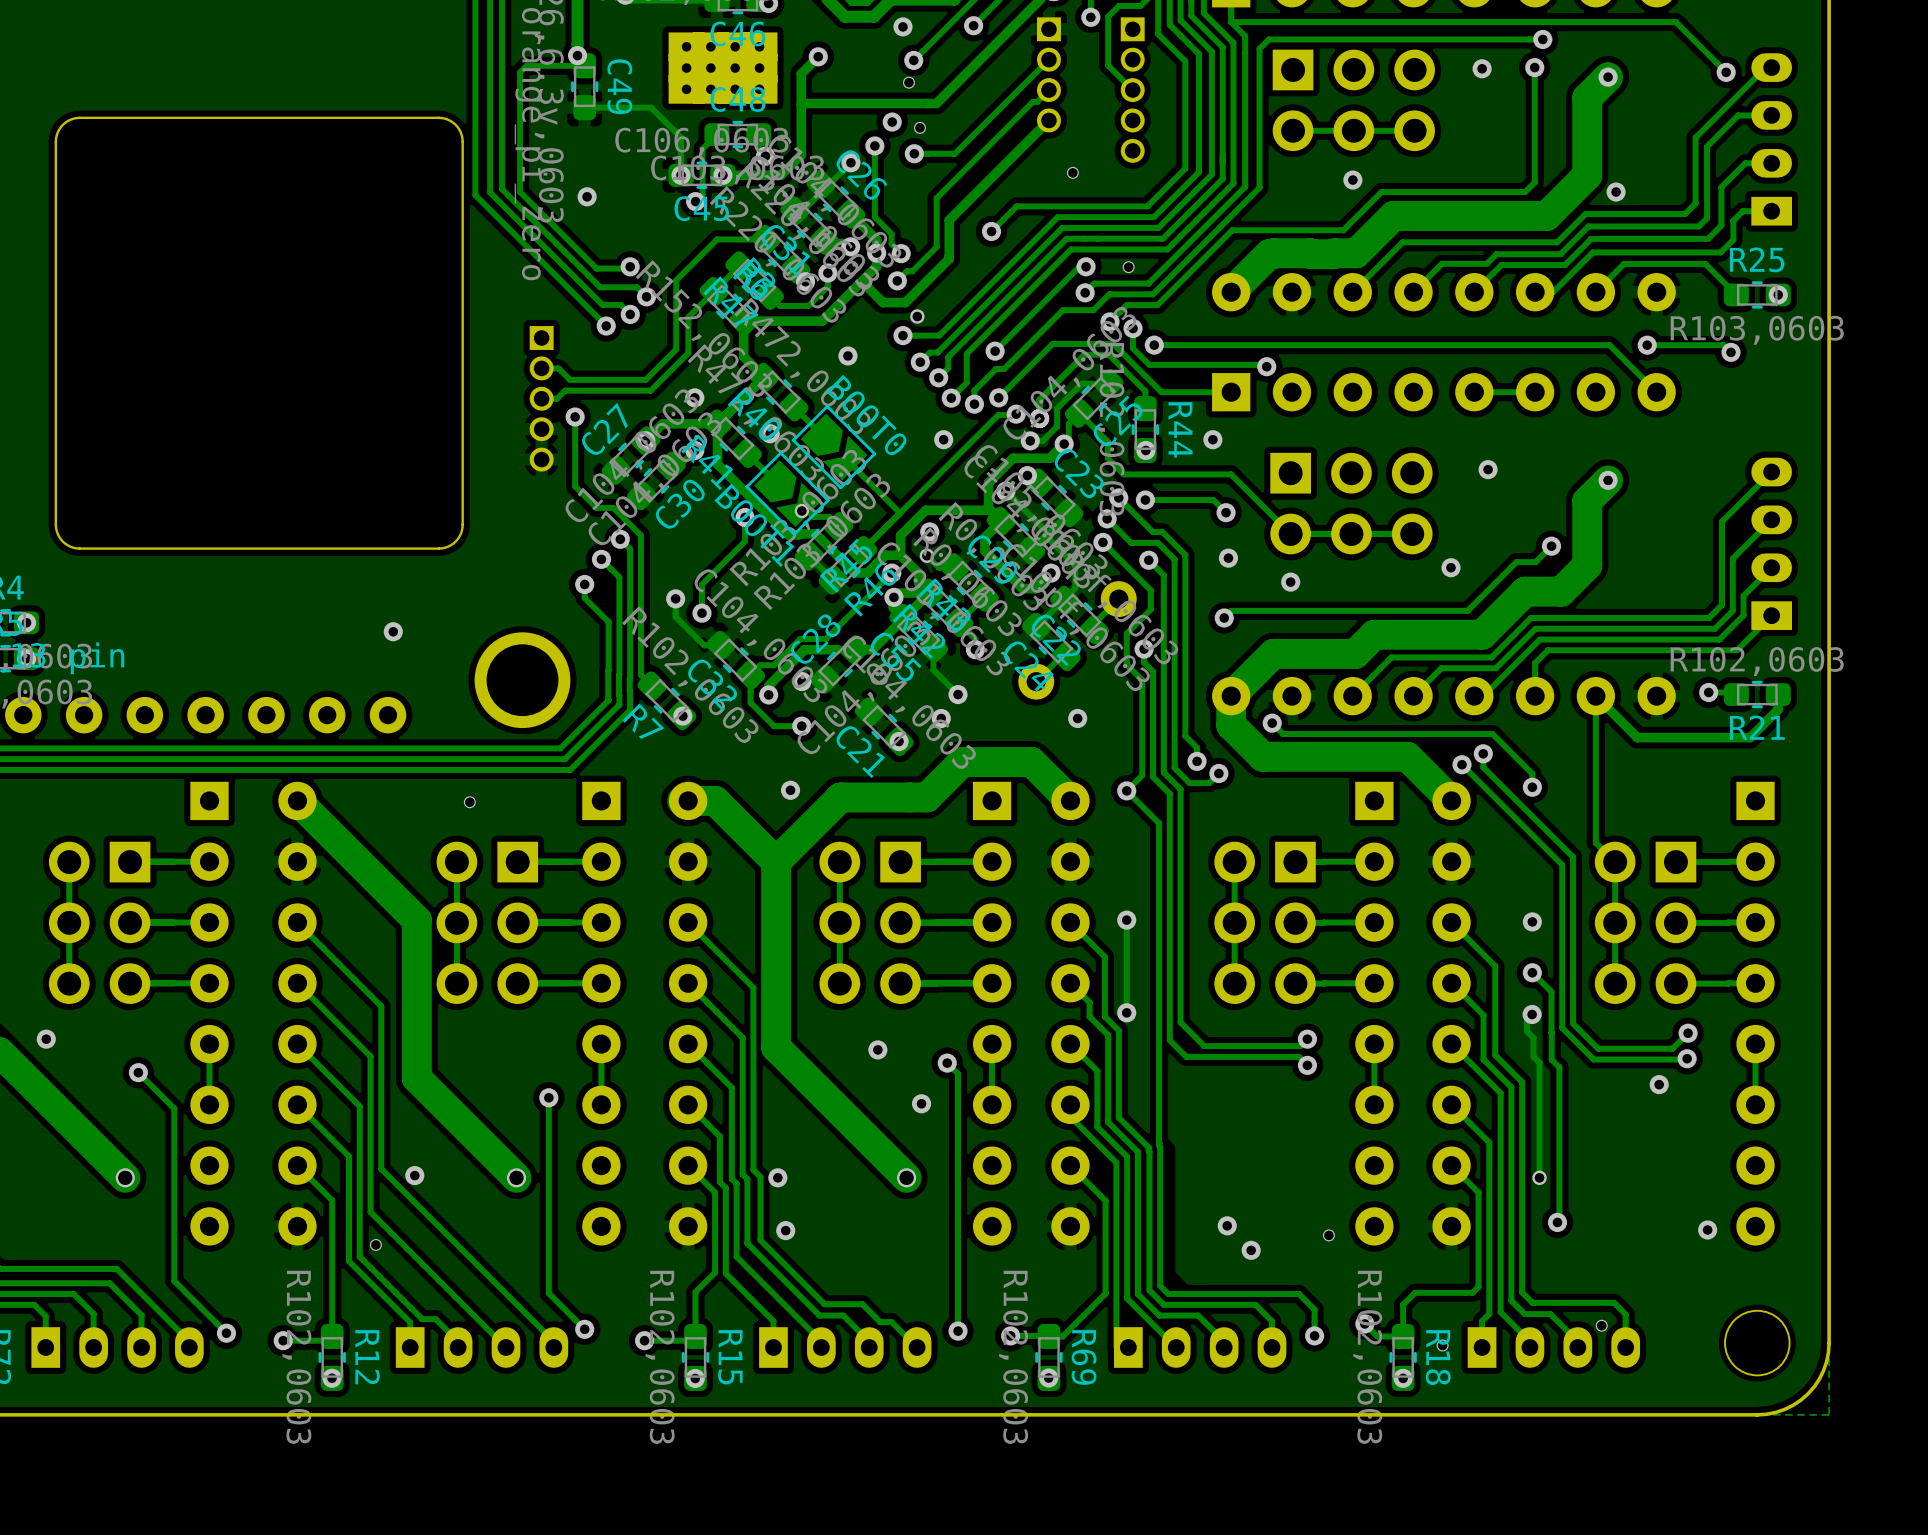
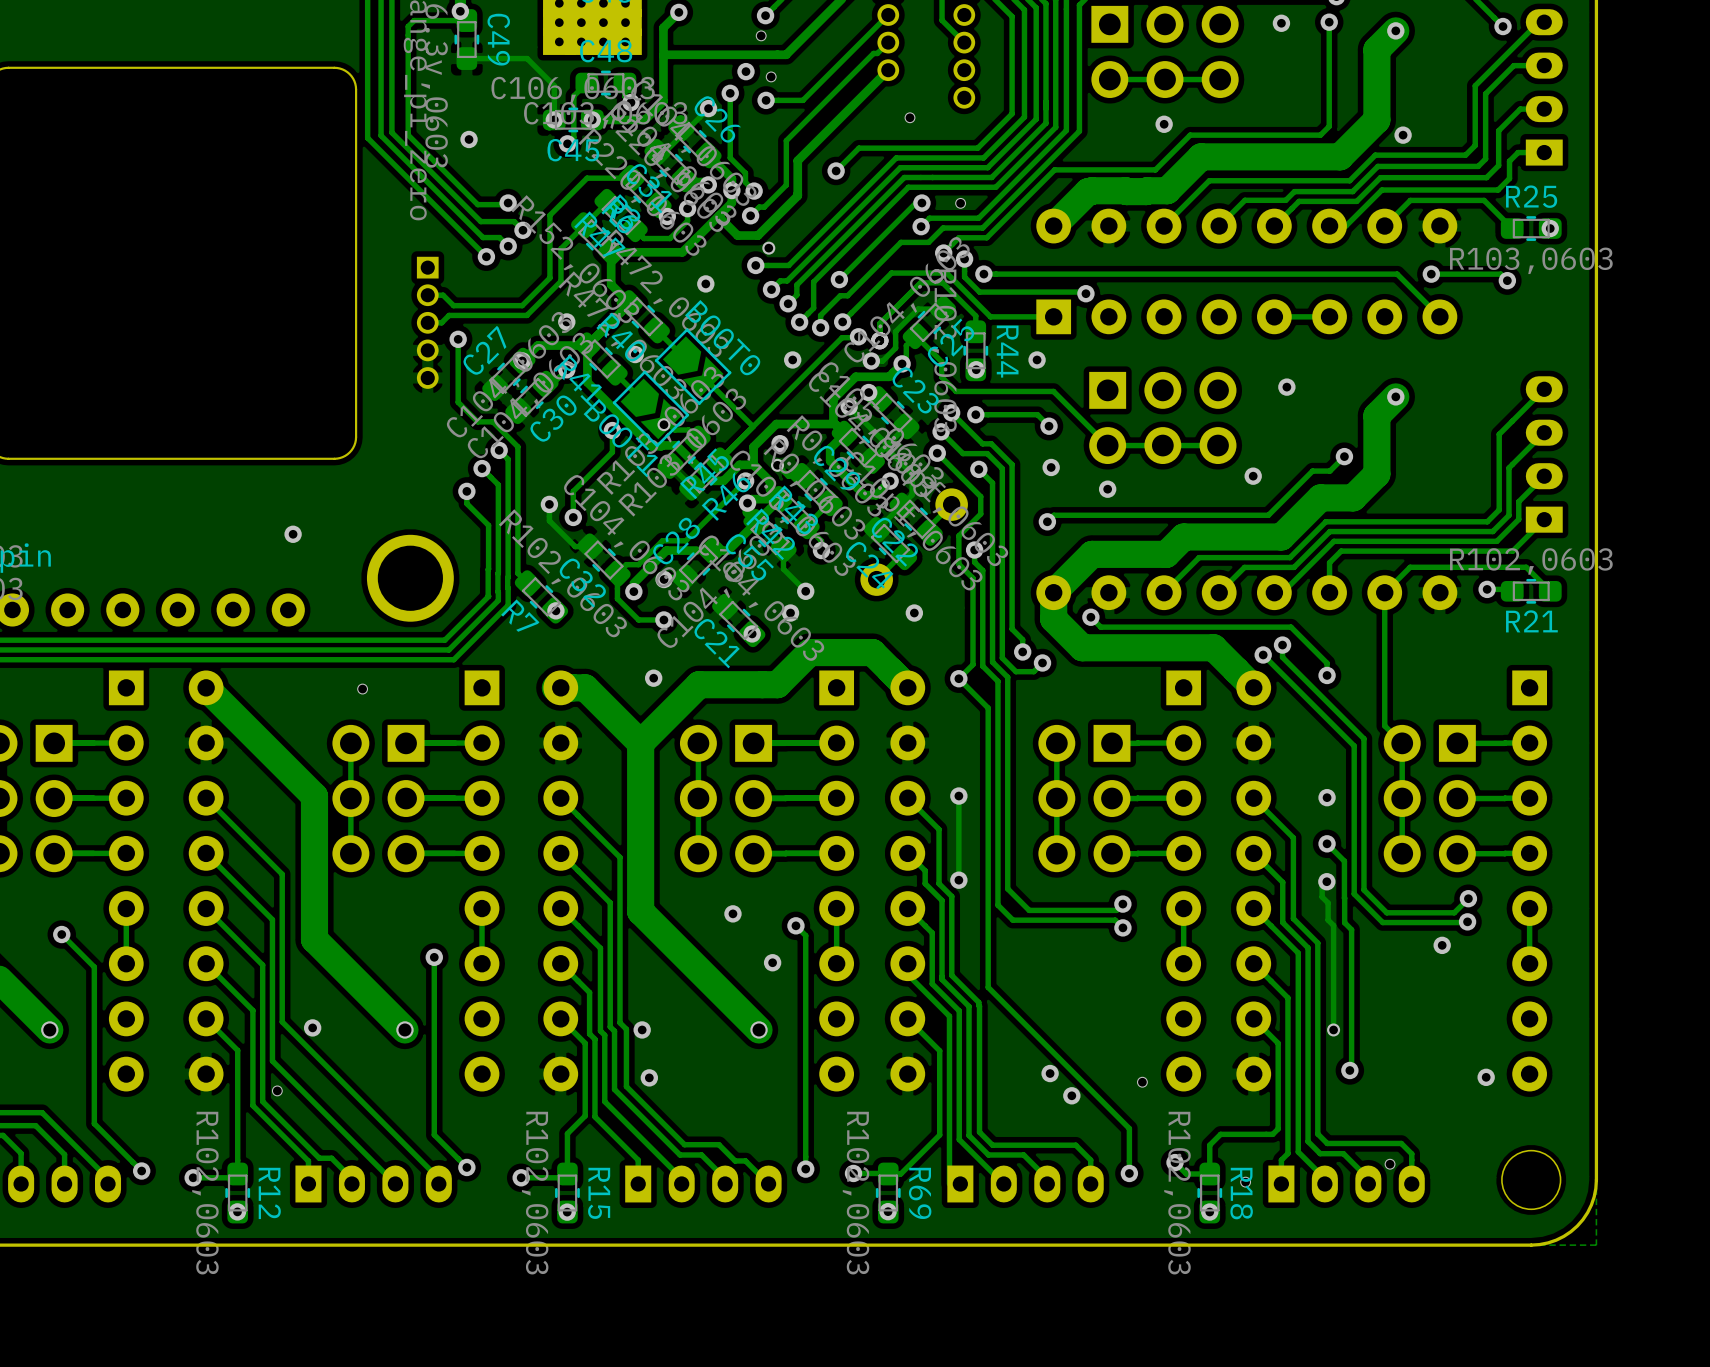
track: (1778, 694) (1778, 709) (1750, 737) (1637, 737) (1595, 696) -> (1550, 591) (1526, 567) (1410, 567) (1384, 592)
track: (1159, 1130) (1160, 1285) (1168, 1294) (1299, 1294) (1314, 1309) -> (988, 987) (1129, 1128) (1129, 1149)

